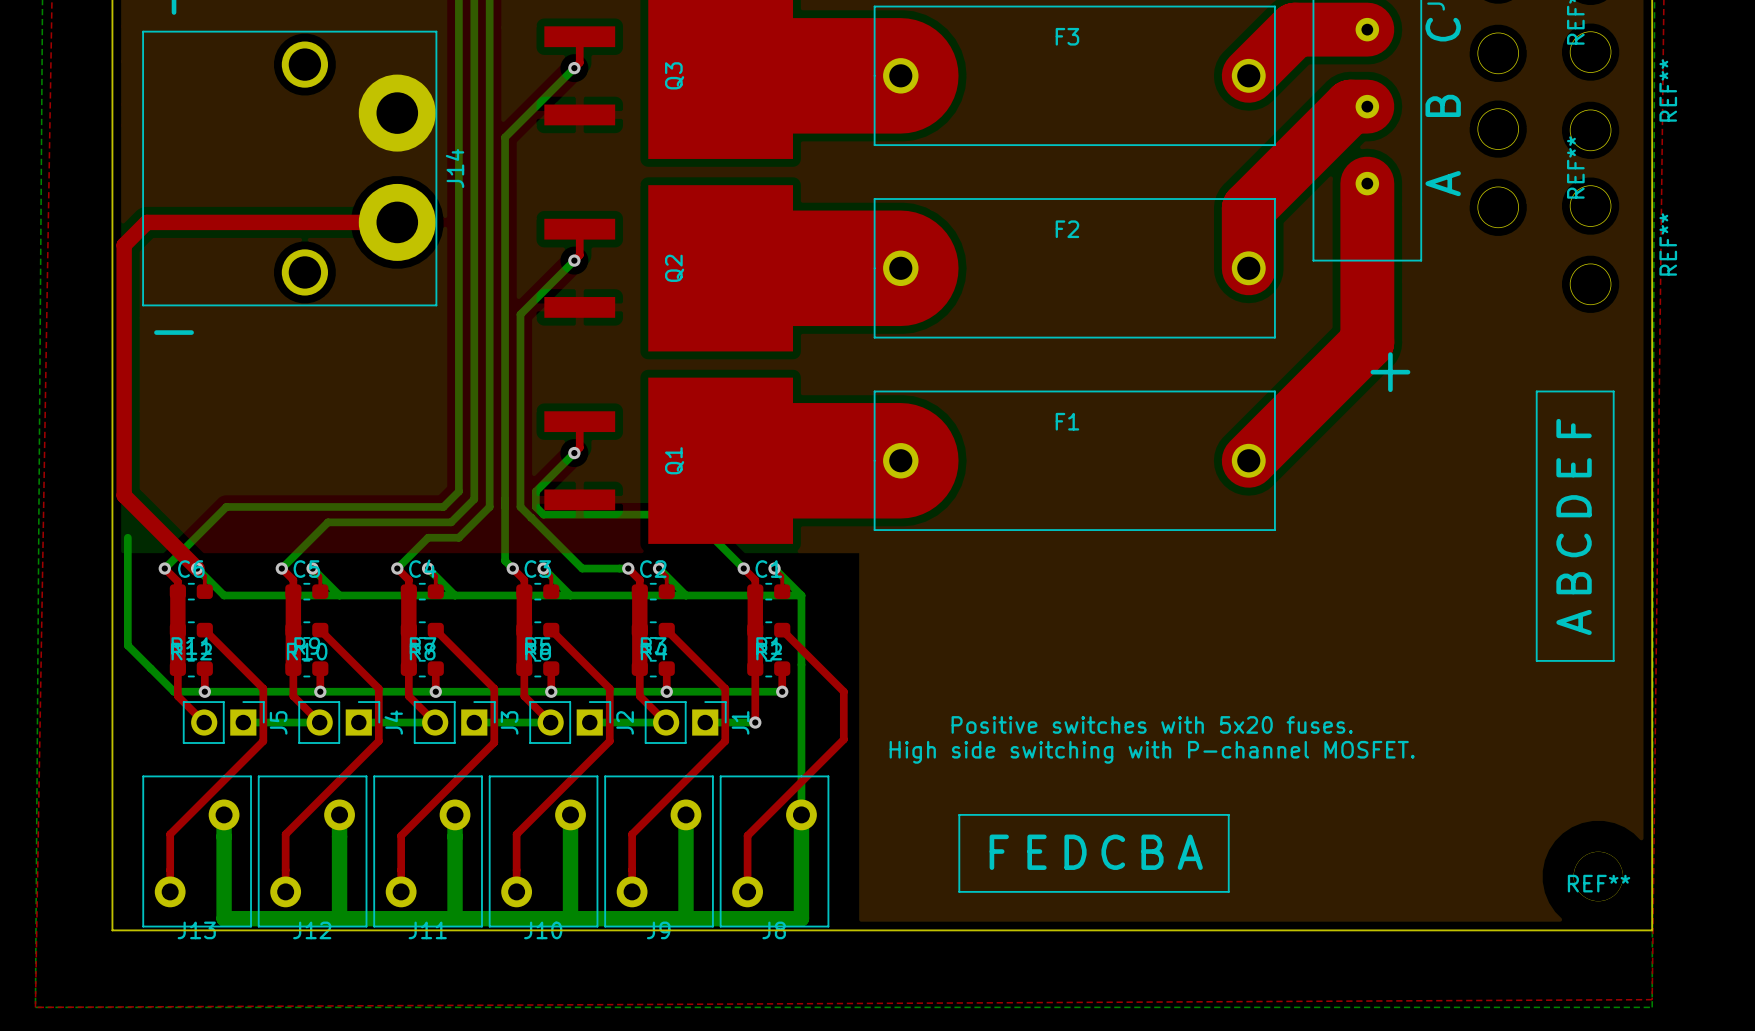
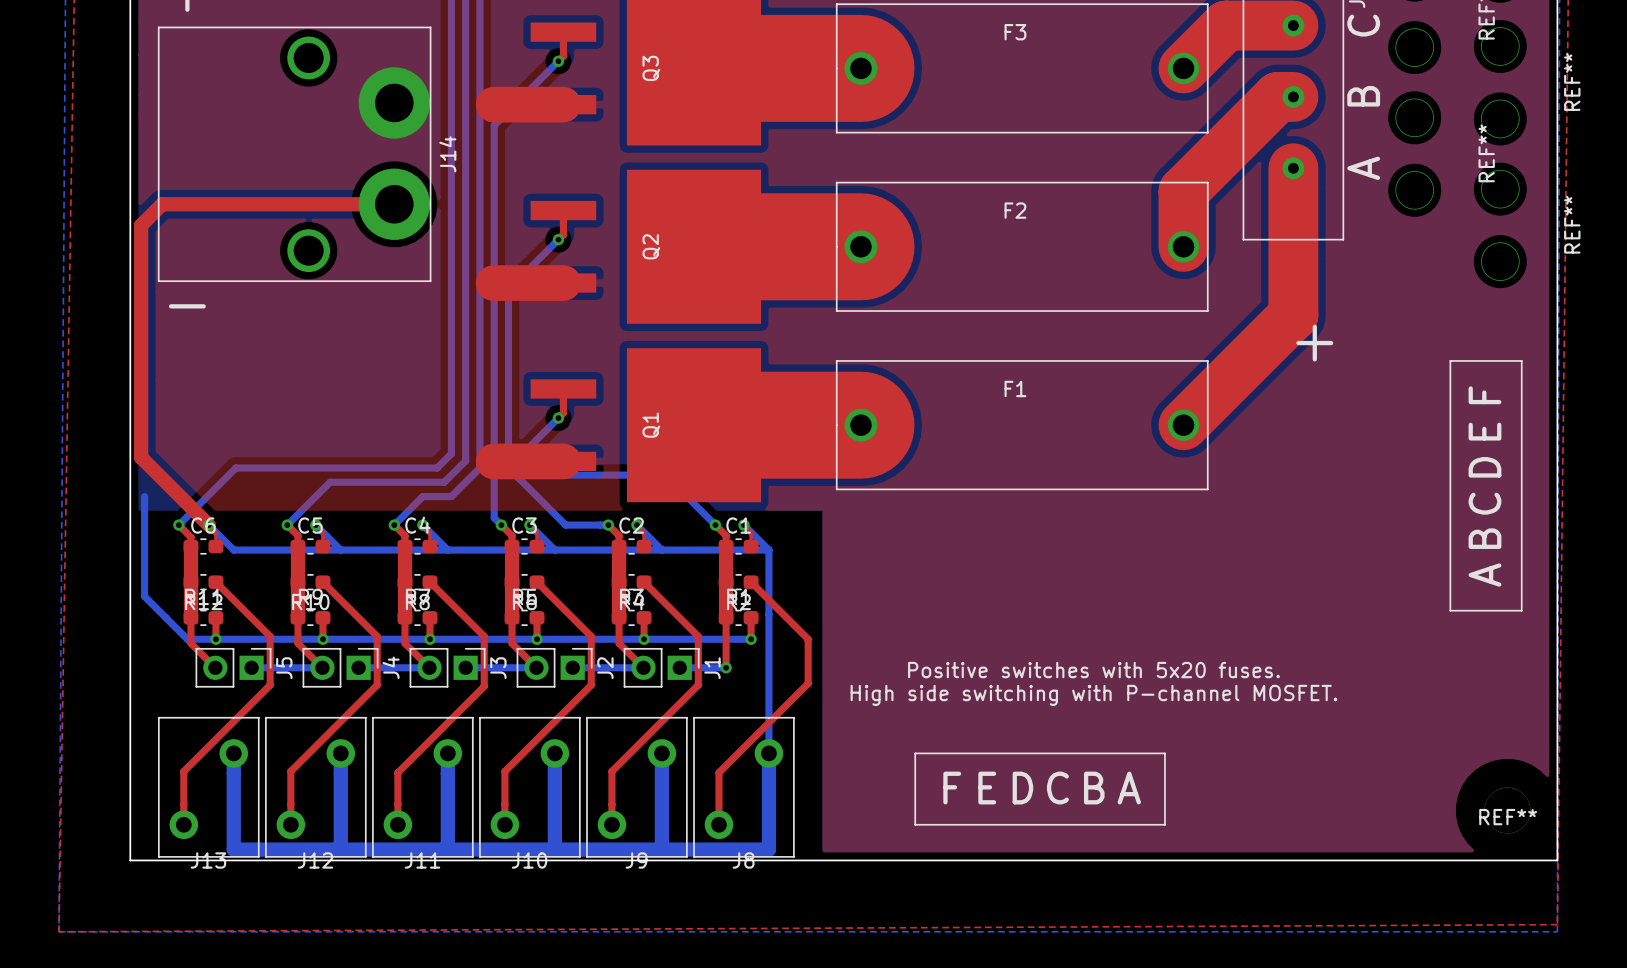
top track: none -> (493, 104) (563, 104)
top track: none -> (493, 283) (563, 283)
top track: none -> (493, 461) (563, 461)

